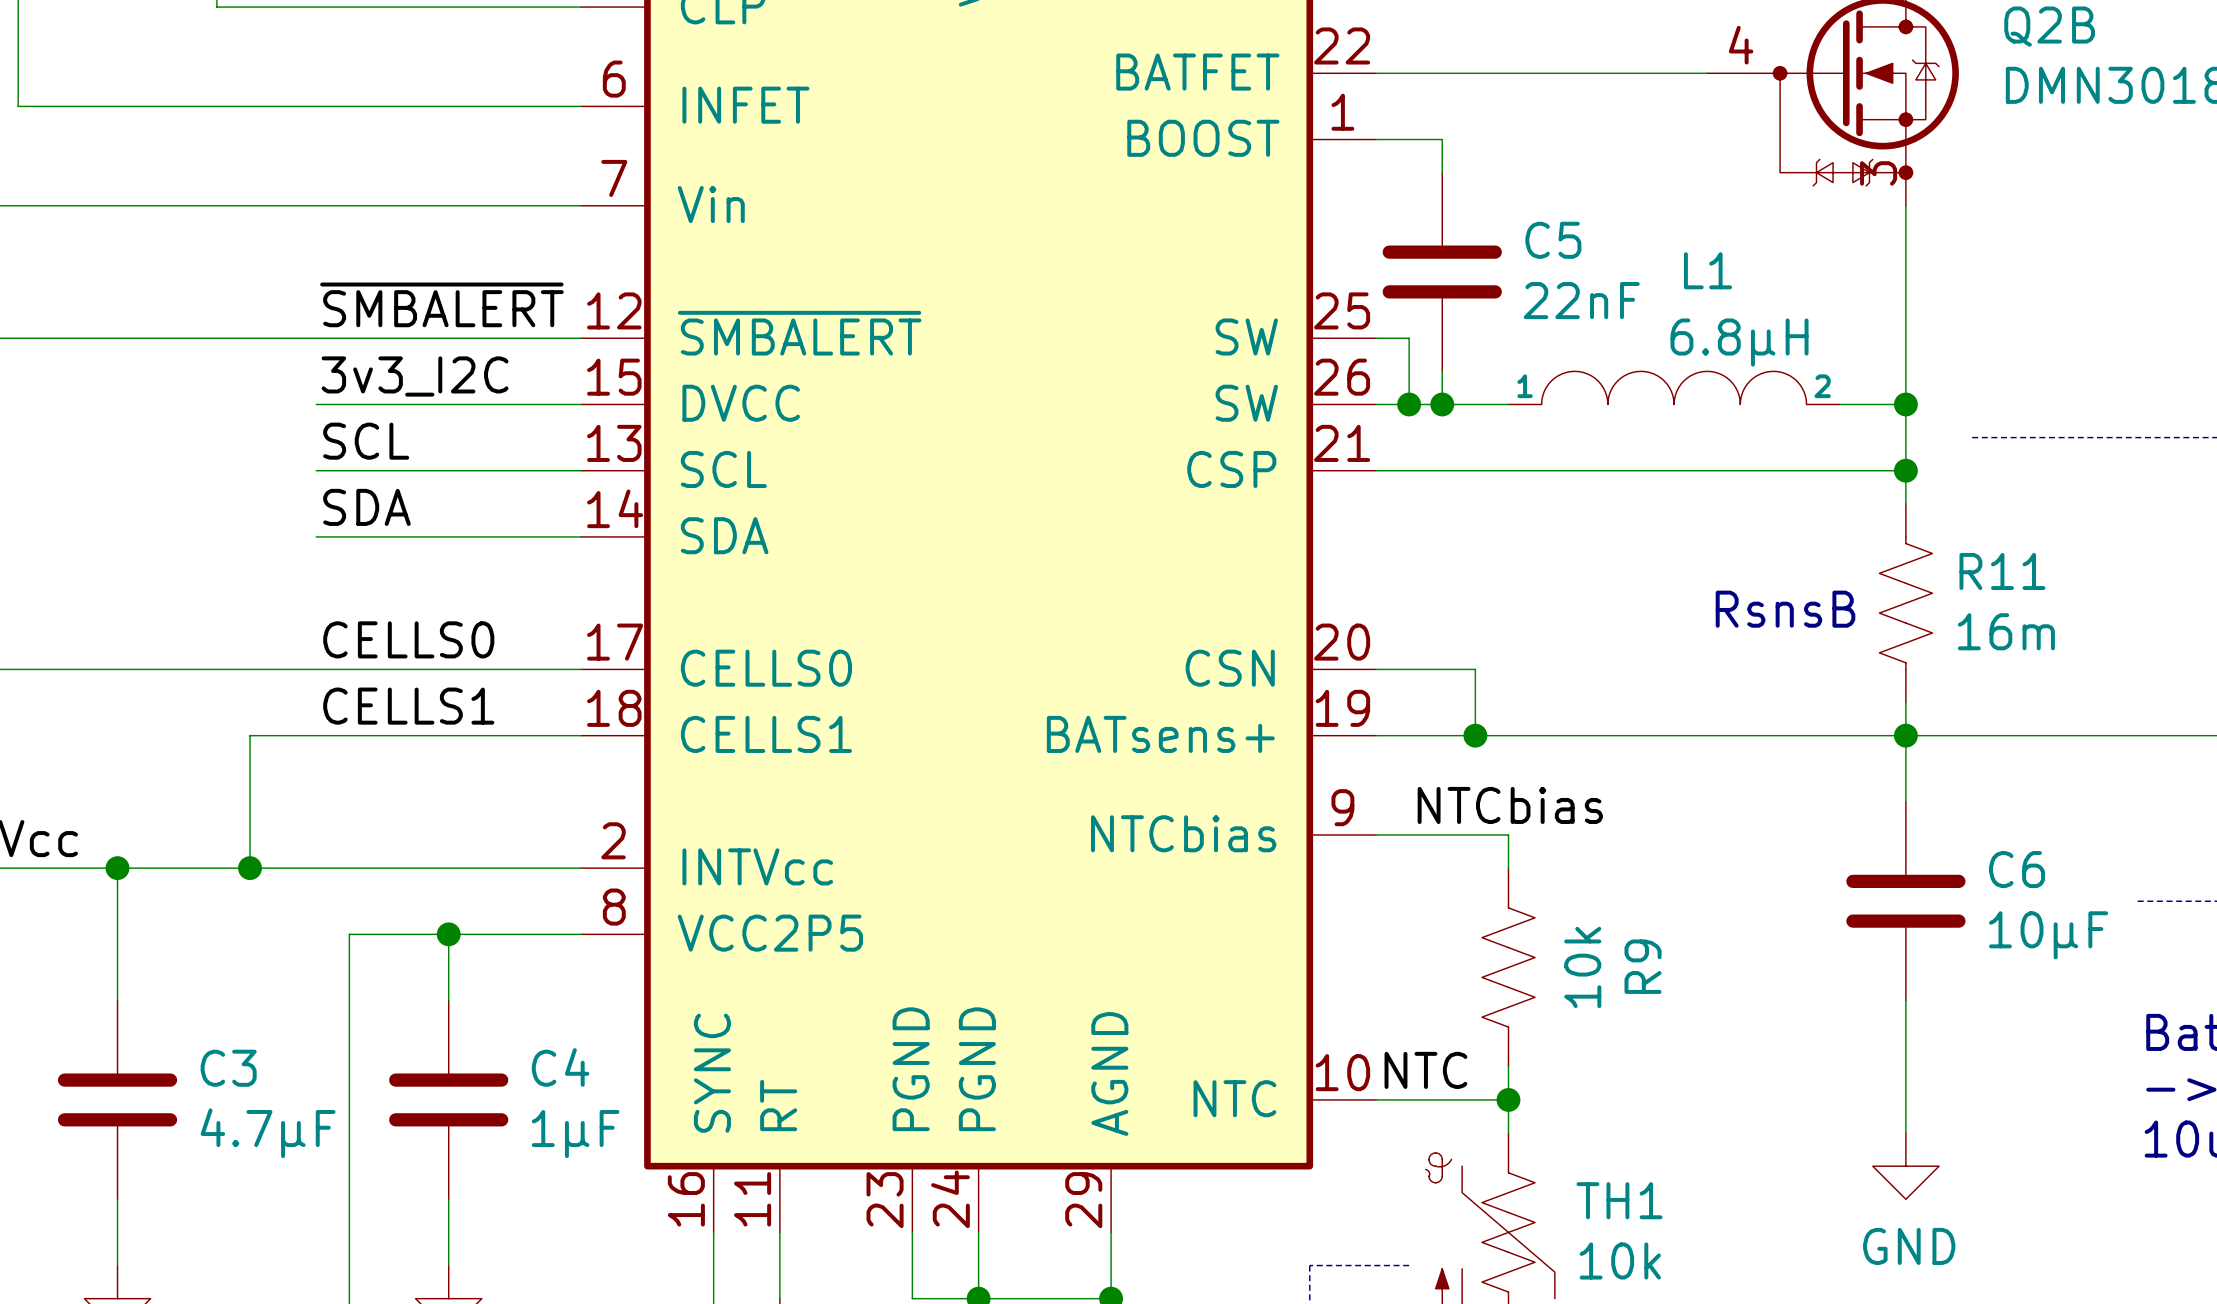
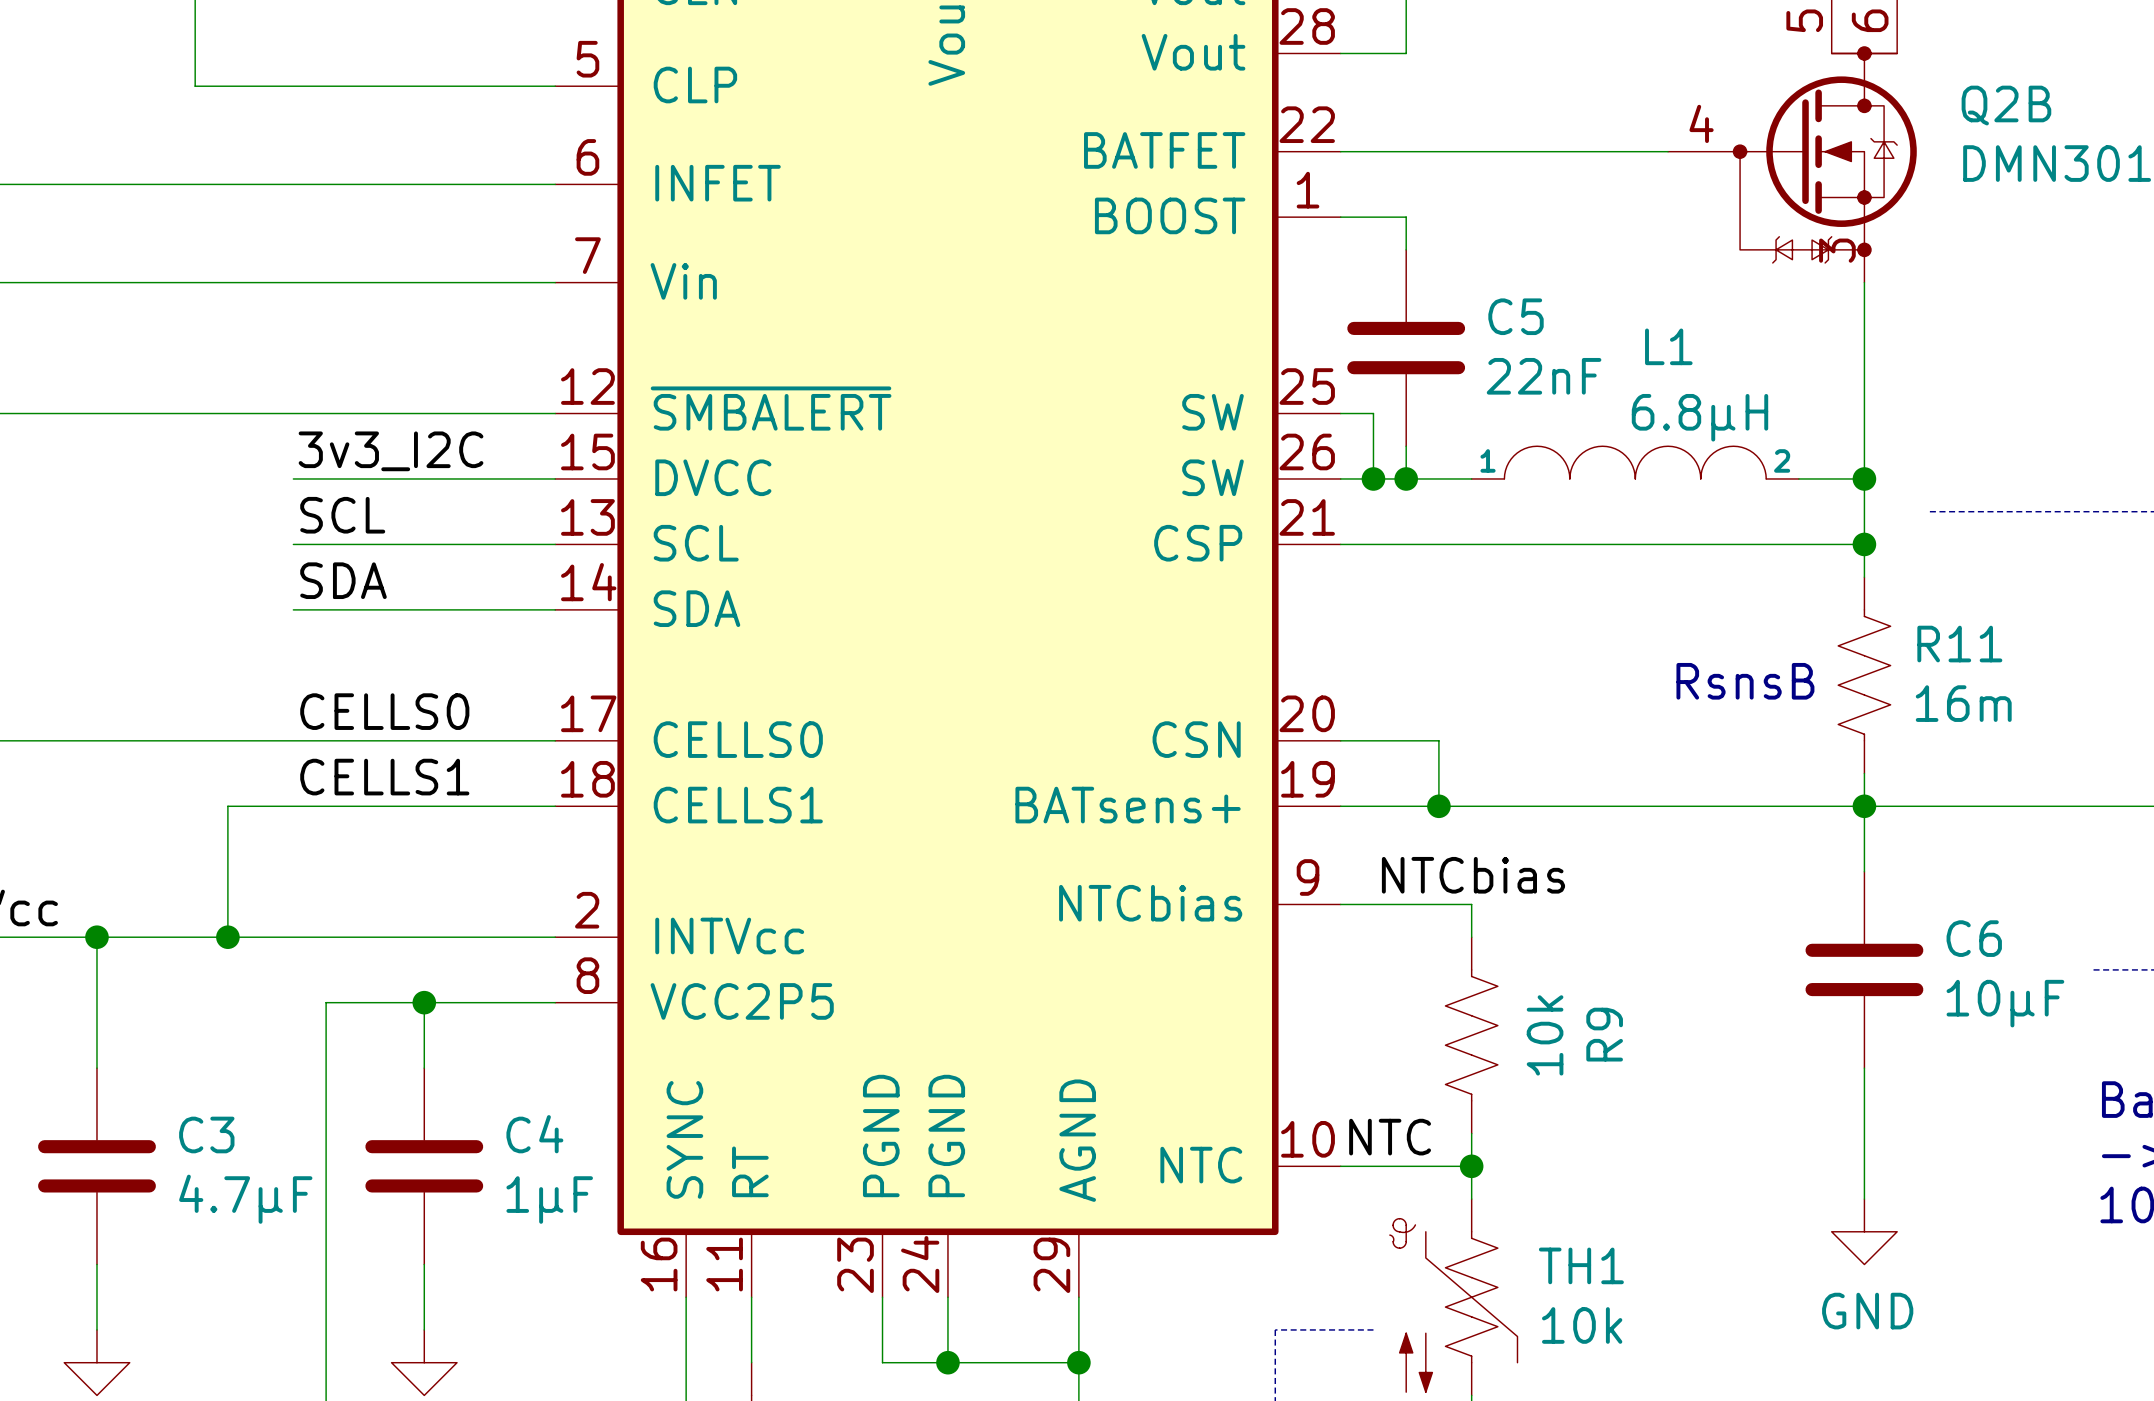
label: ~{SMBALERT} (441, 304) -> none

